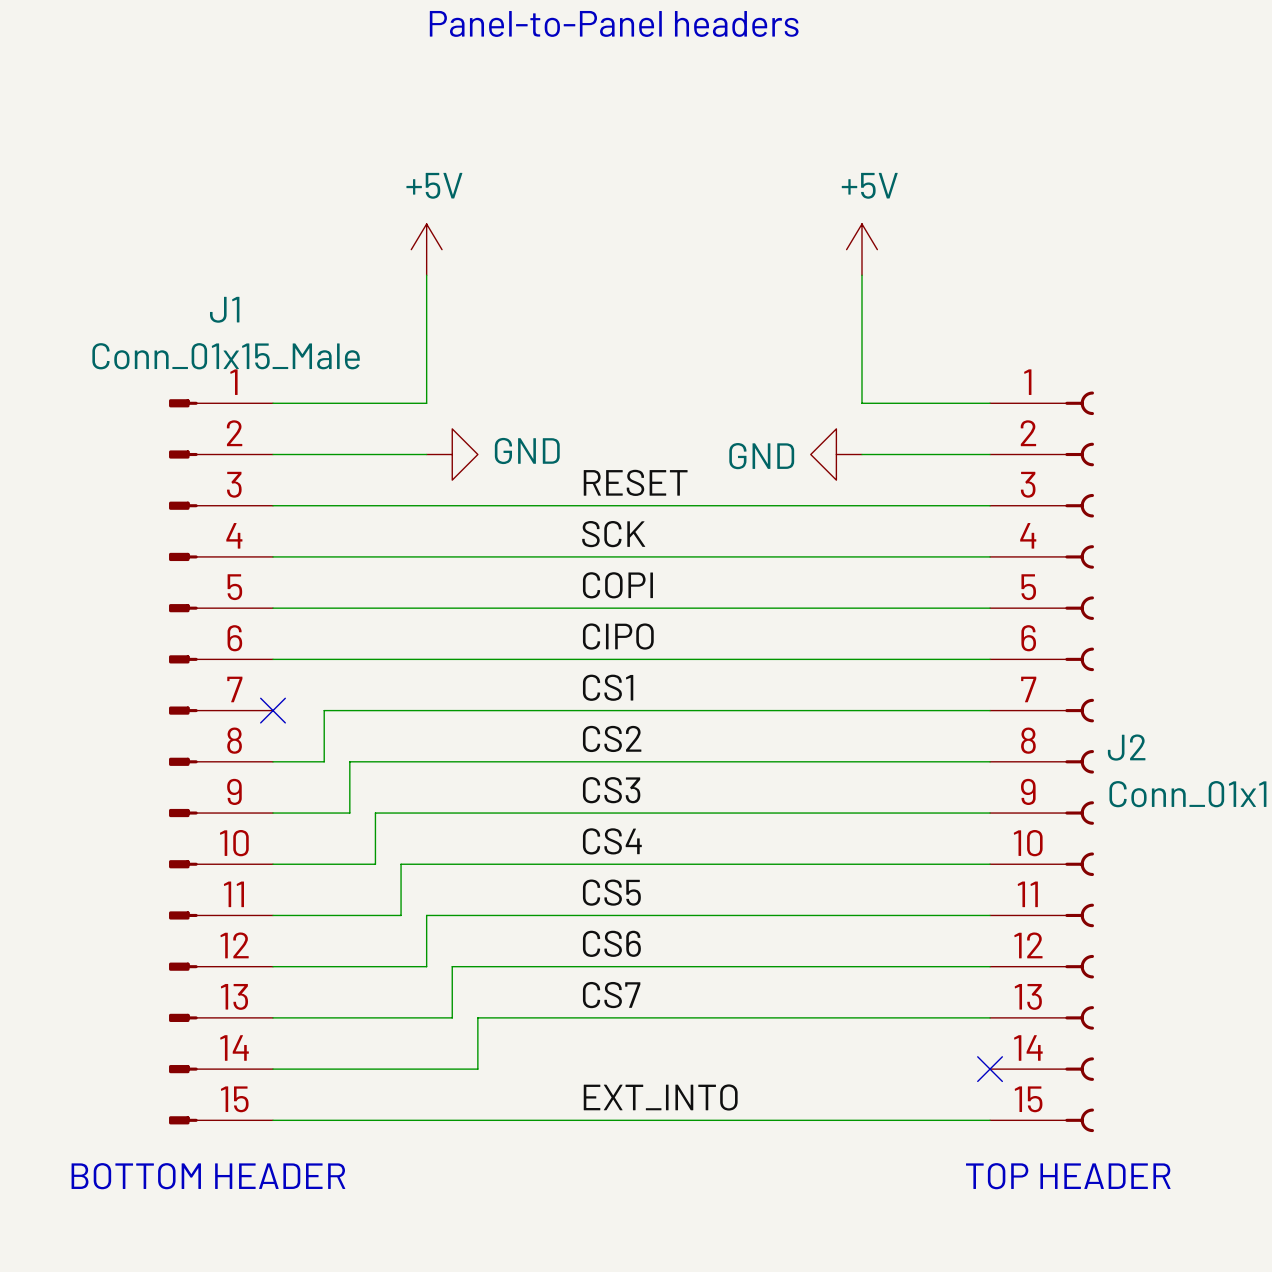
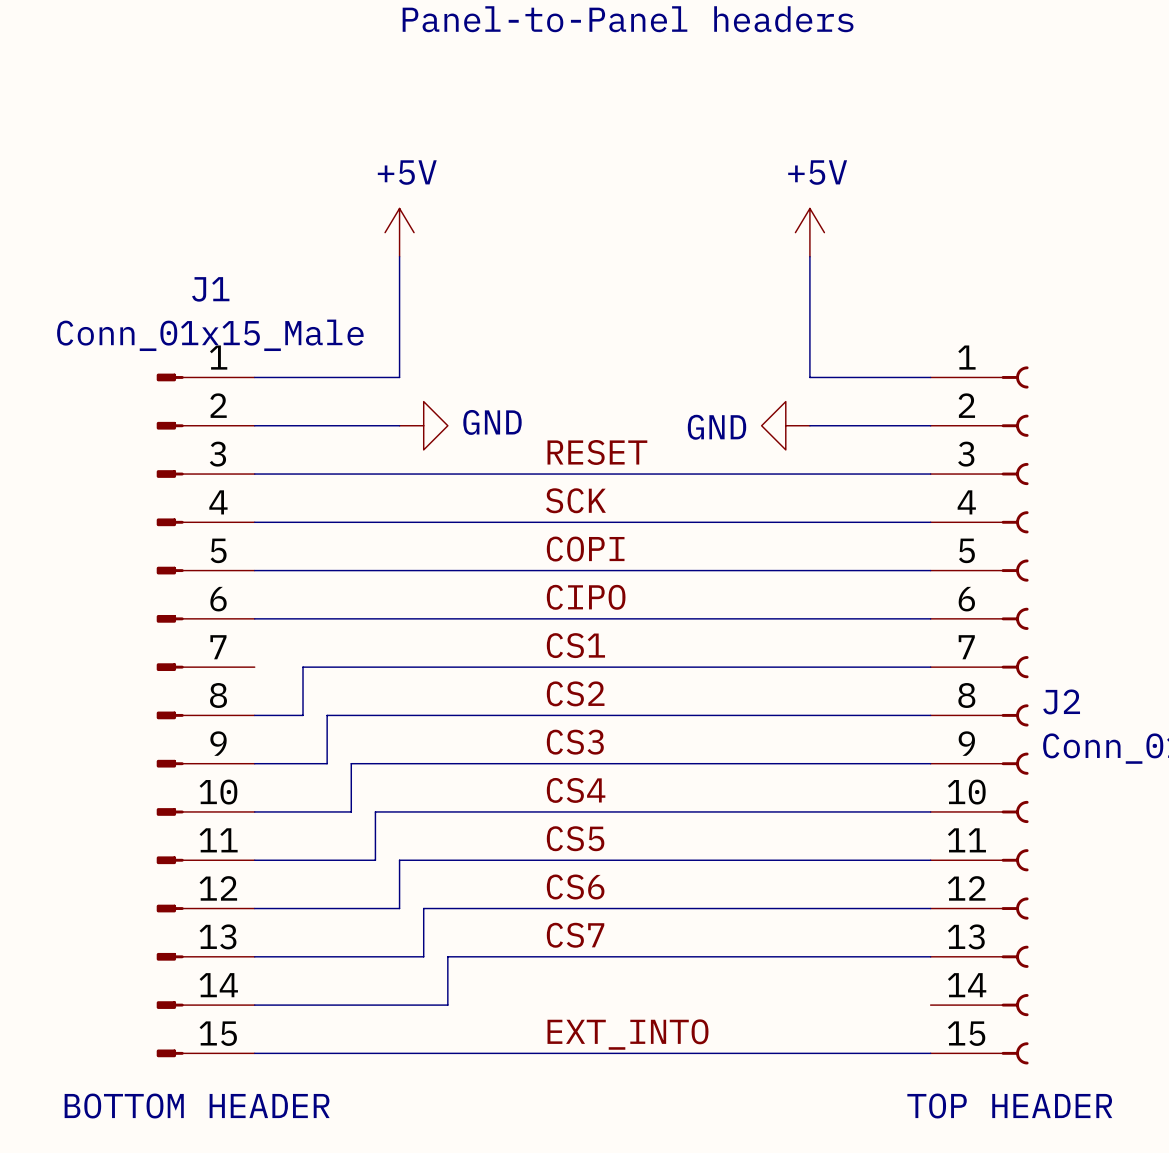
no-connect mark: (273, 710) -> none
no-connect mark: (990, 1069) -> none

